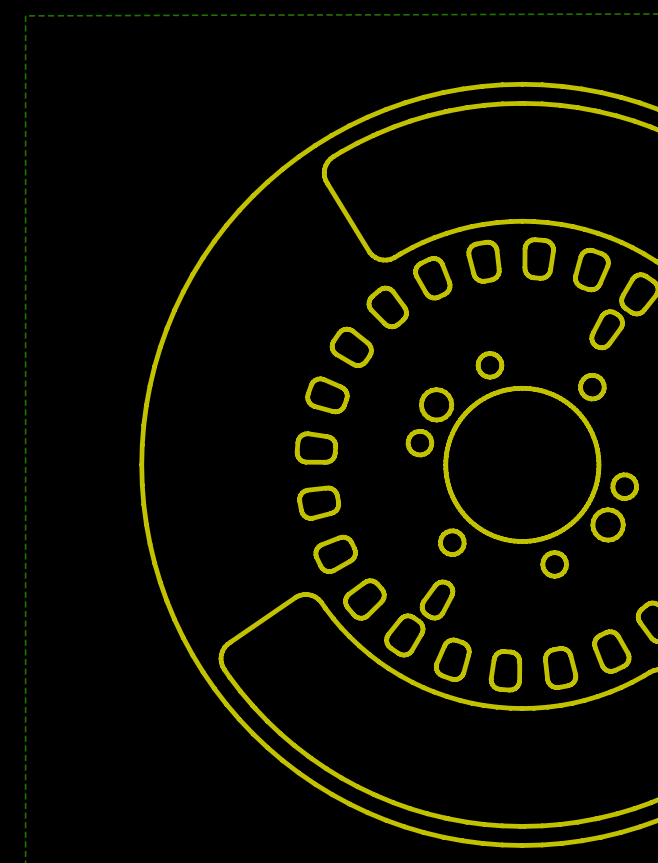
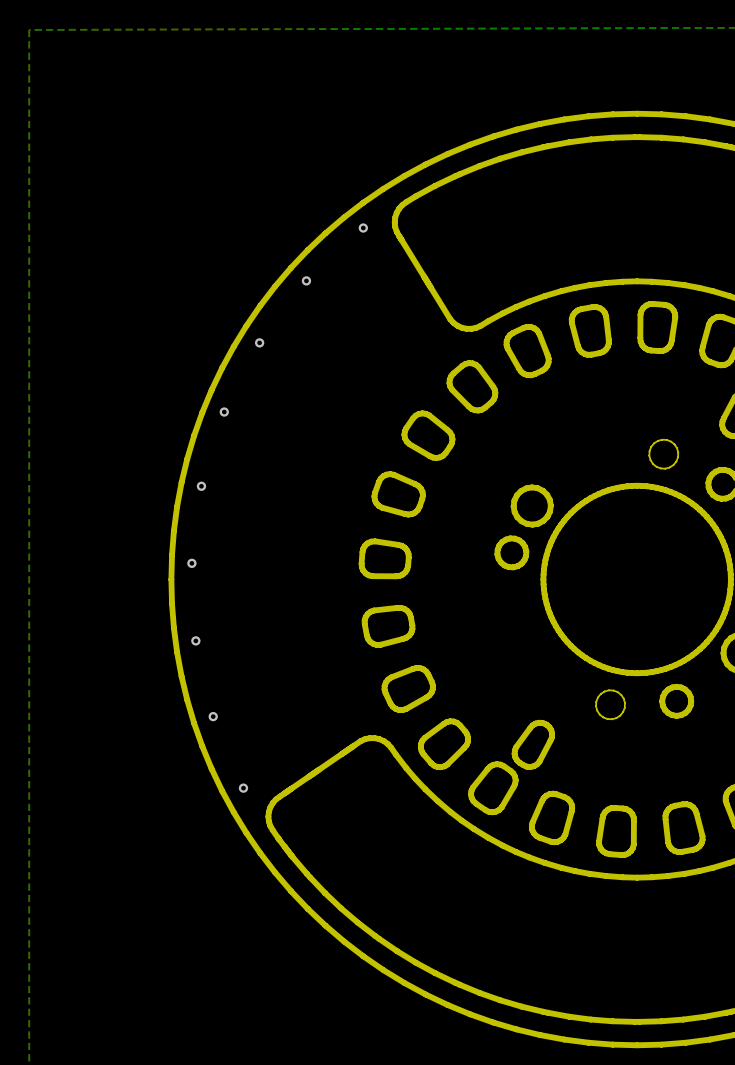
via: none -> (363, 228)
via: none -> (306, 280)
via: none -> (259, 342)
via: none -> (224, 412)
board edge: none -> (662, 439) (671, 441) (678, 452) (676, 461) (665, 468) (652, 463) (649, 455) (654, 443) (662, 439)
board edge: (489, 353) (499, 358) (501, 365) (499, 372) (489, 377) (480, 372) (478, 365) (480, 358) (489, 353) -> none
via: none -> (201, 486)
via: none -> (191, 563)
via: none -> (195, 640)
board edge: (453, 530) (462, 536) (464, 543) (461, 550) (451, 554) (442, 548) (440, 541) (443, 534) (453, 530) -> none
board edge: none -> (609, 690) (621, 695) (625, 703) (620, 715) (612, 719) (603, 717) (596, 706) (597, 697) (609, 690)
via: none -> (213, 716)
via: none -> (243, 788)

